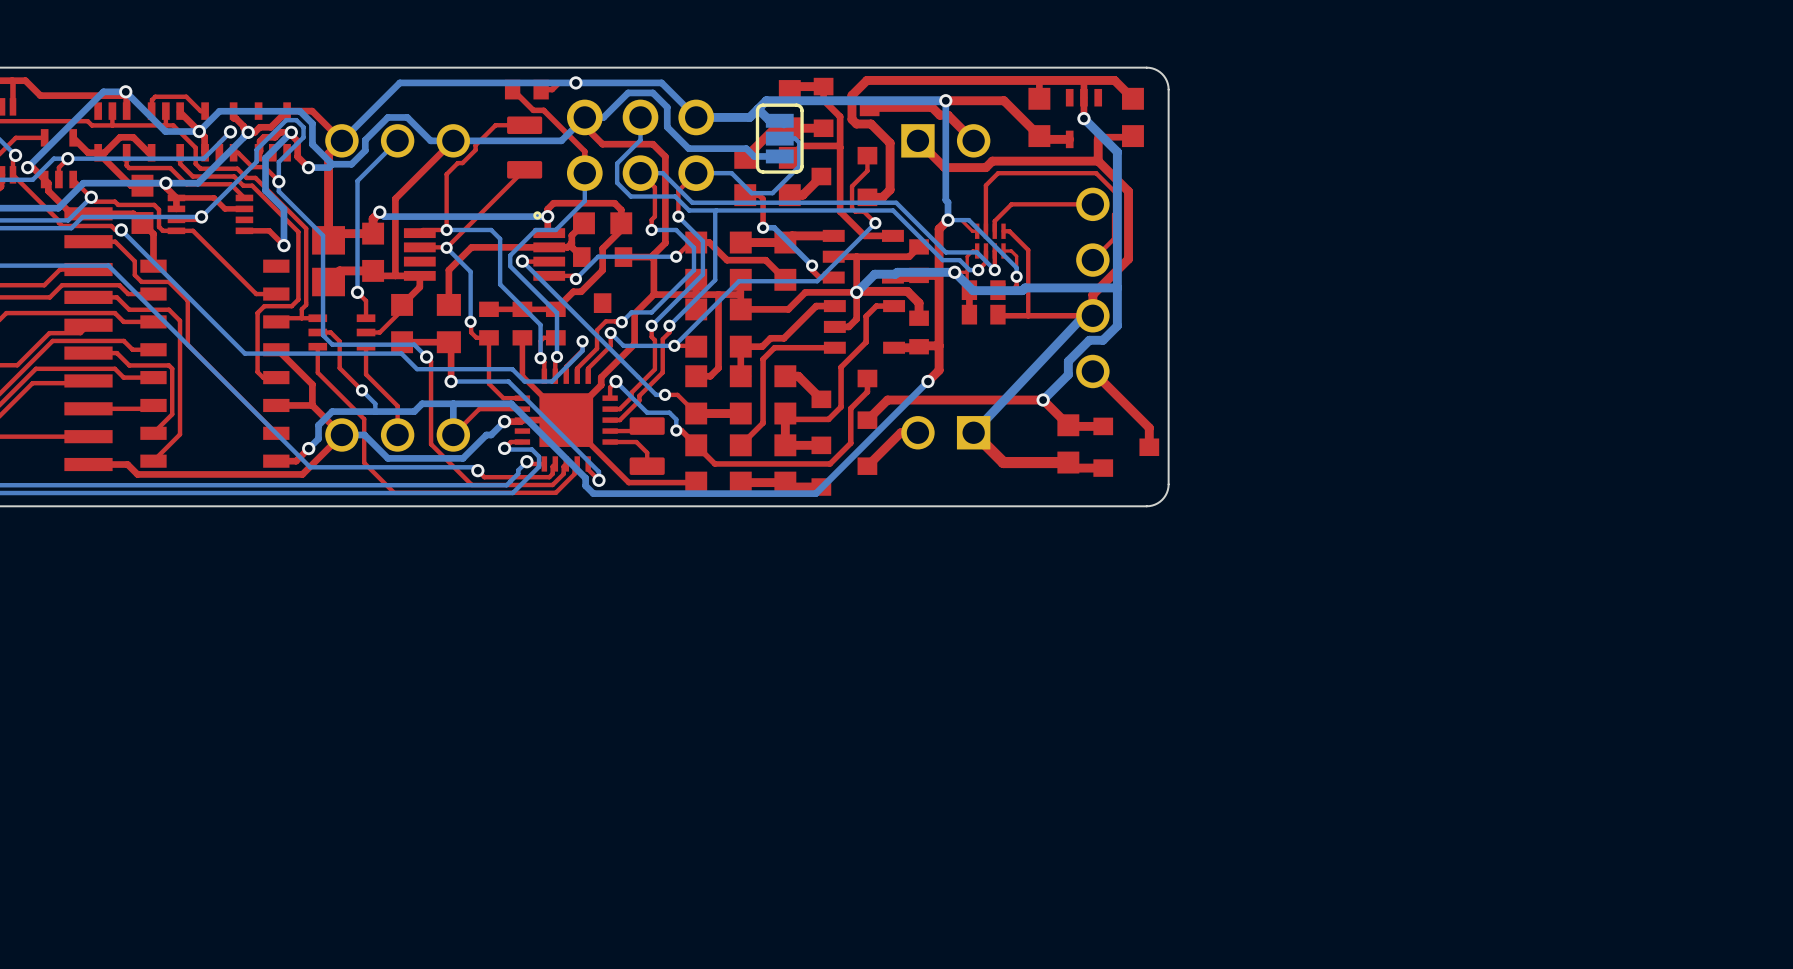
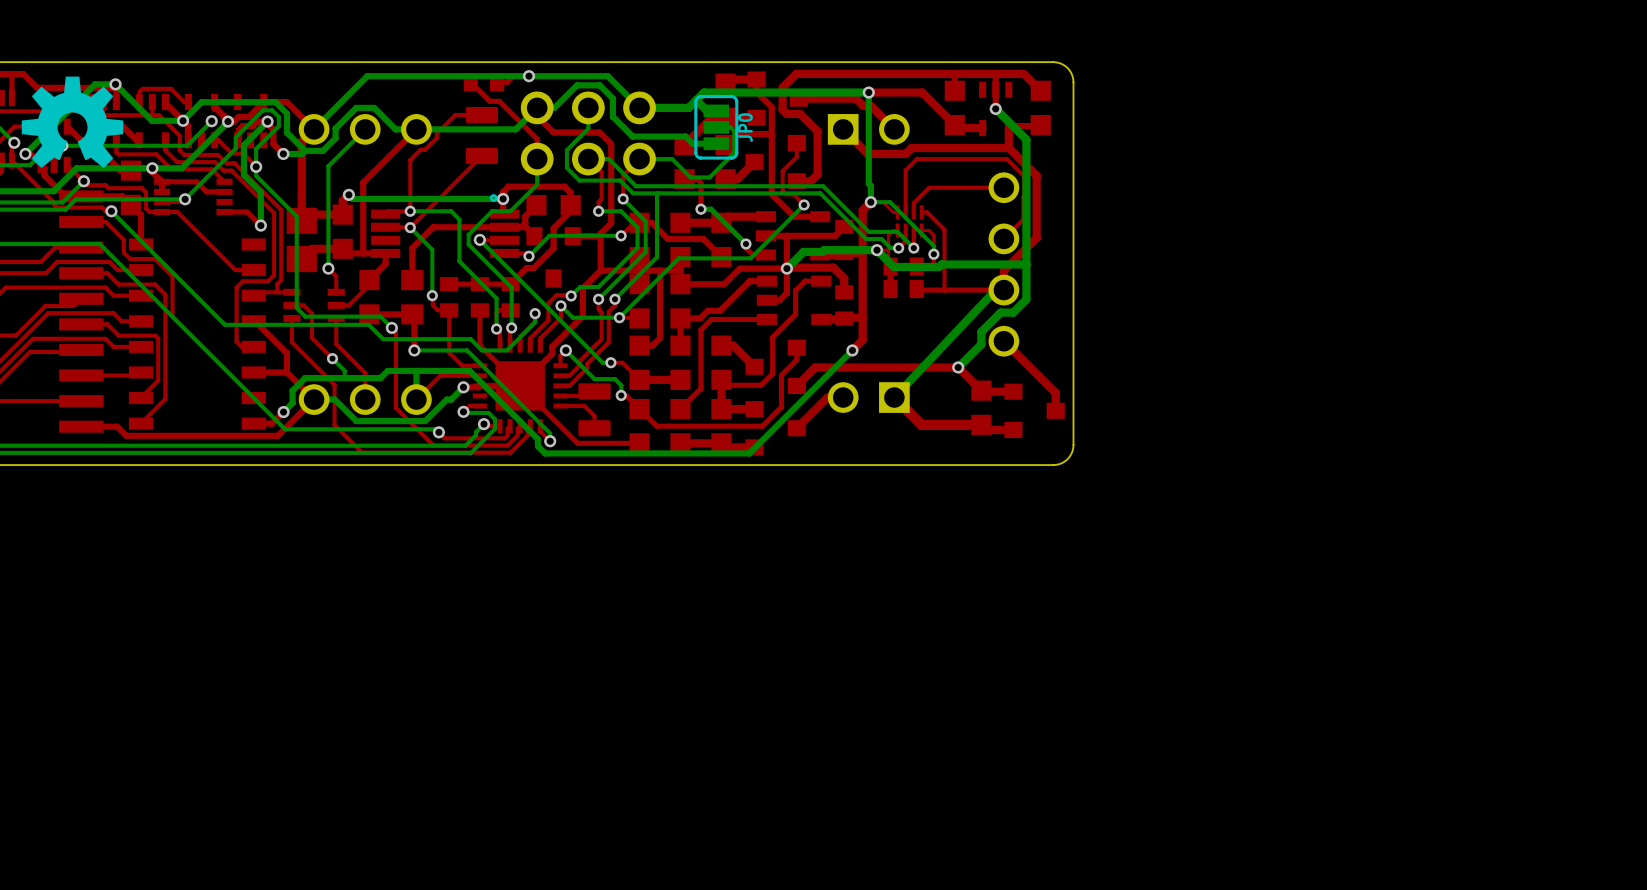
drawing: none -> [21, 76, 124, 168]
JP0 name: none -> JP0 (745, 127)

